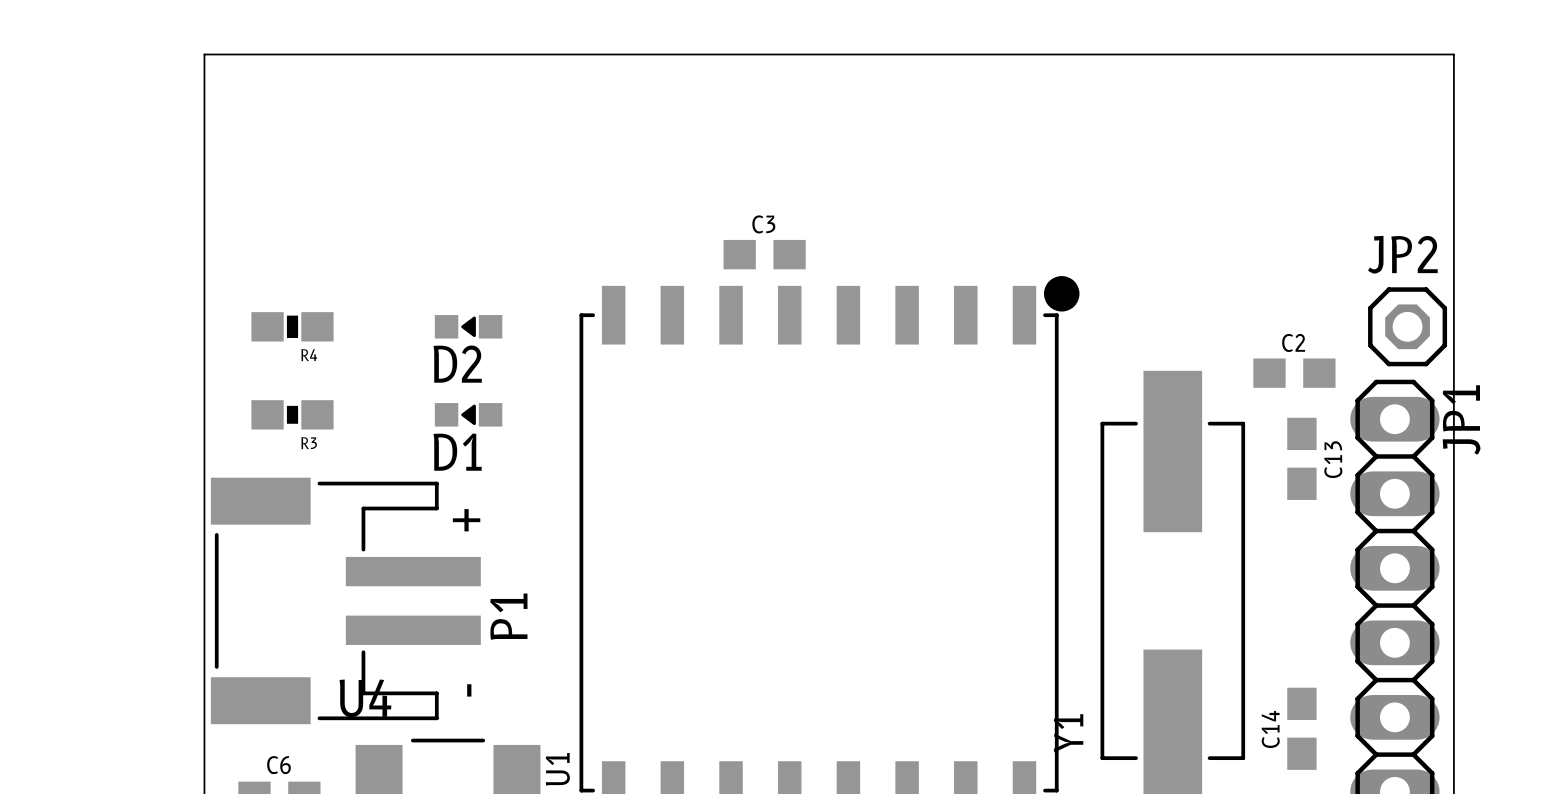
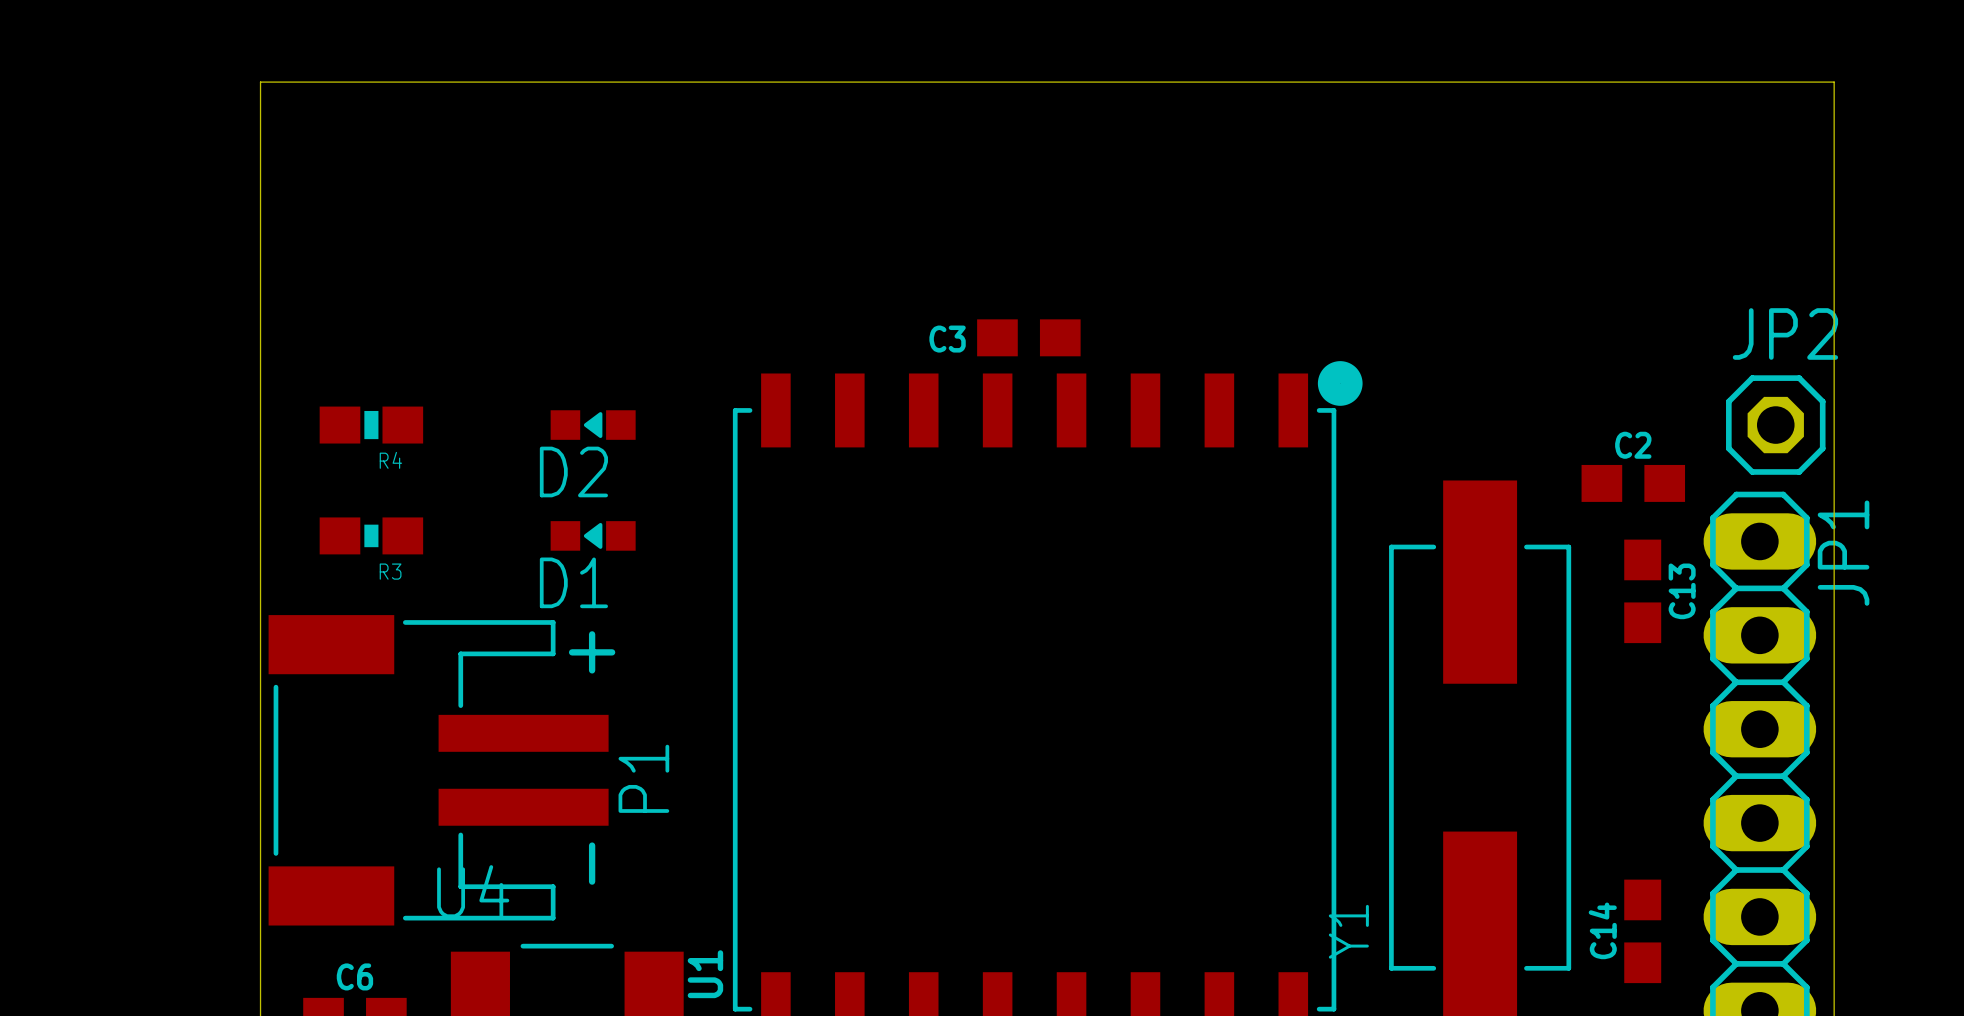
C3 name position: C3 (763, 224) -> C3 (947, 339)
C3 position: (764, 254) -> (1028, 337)

